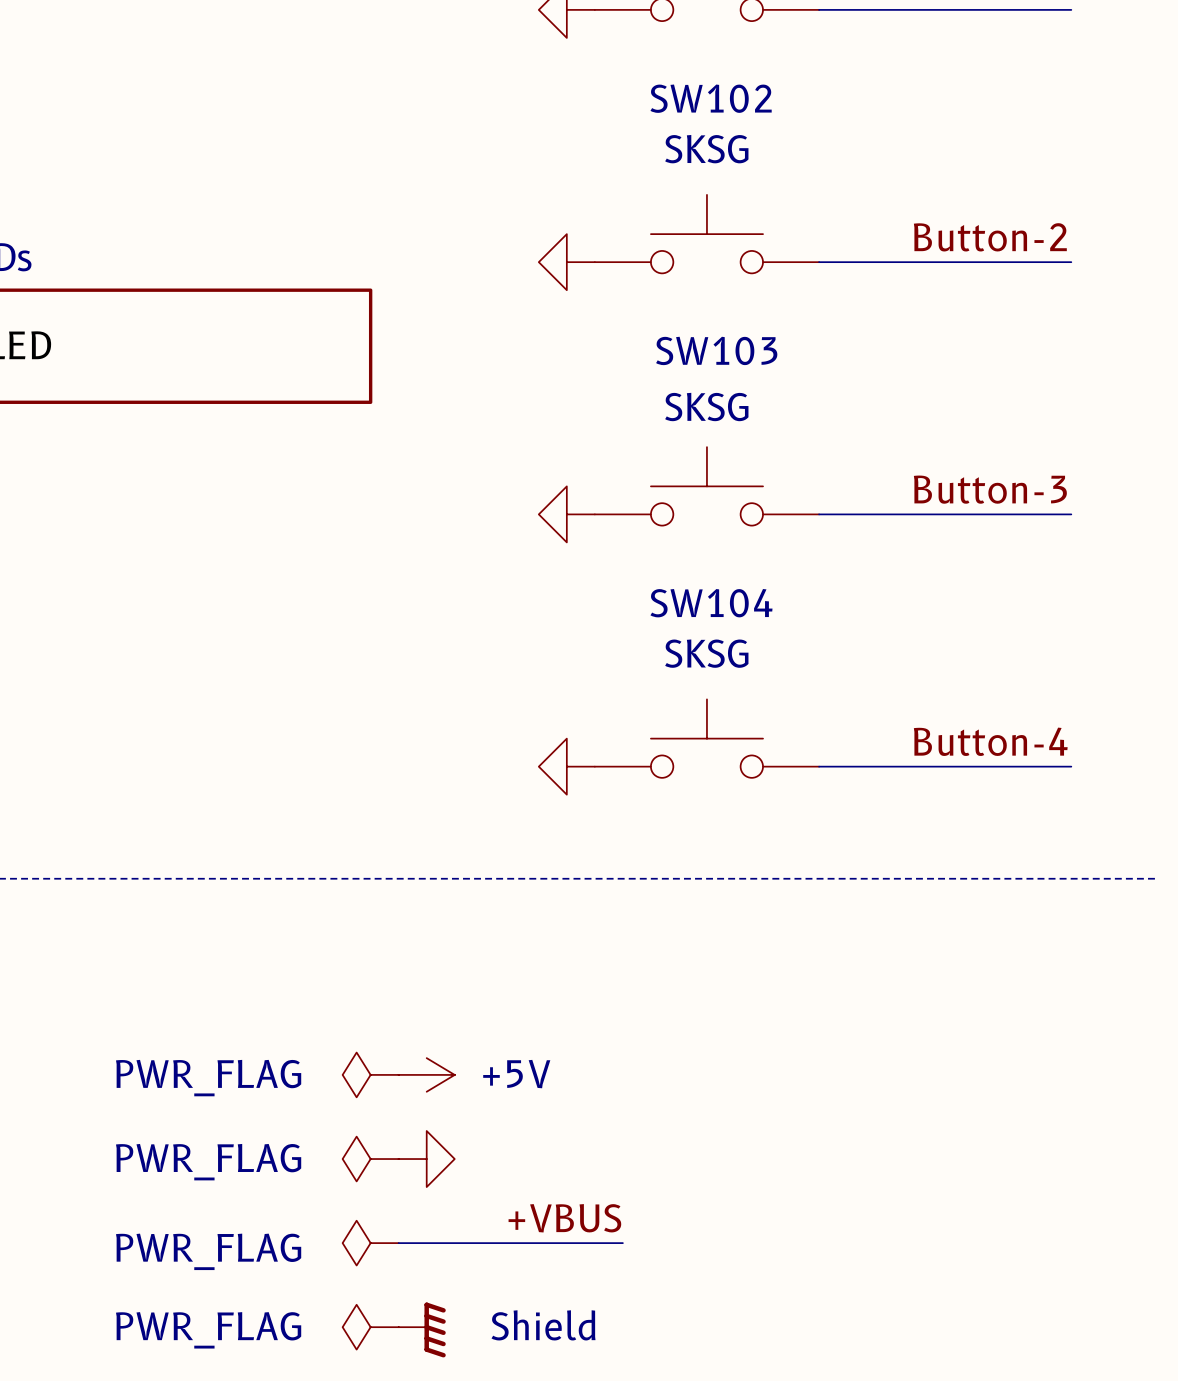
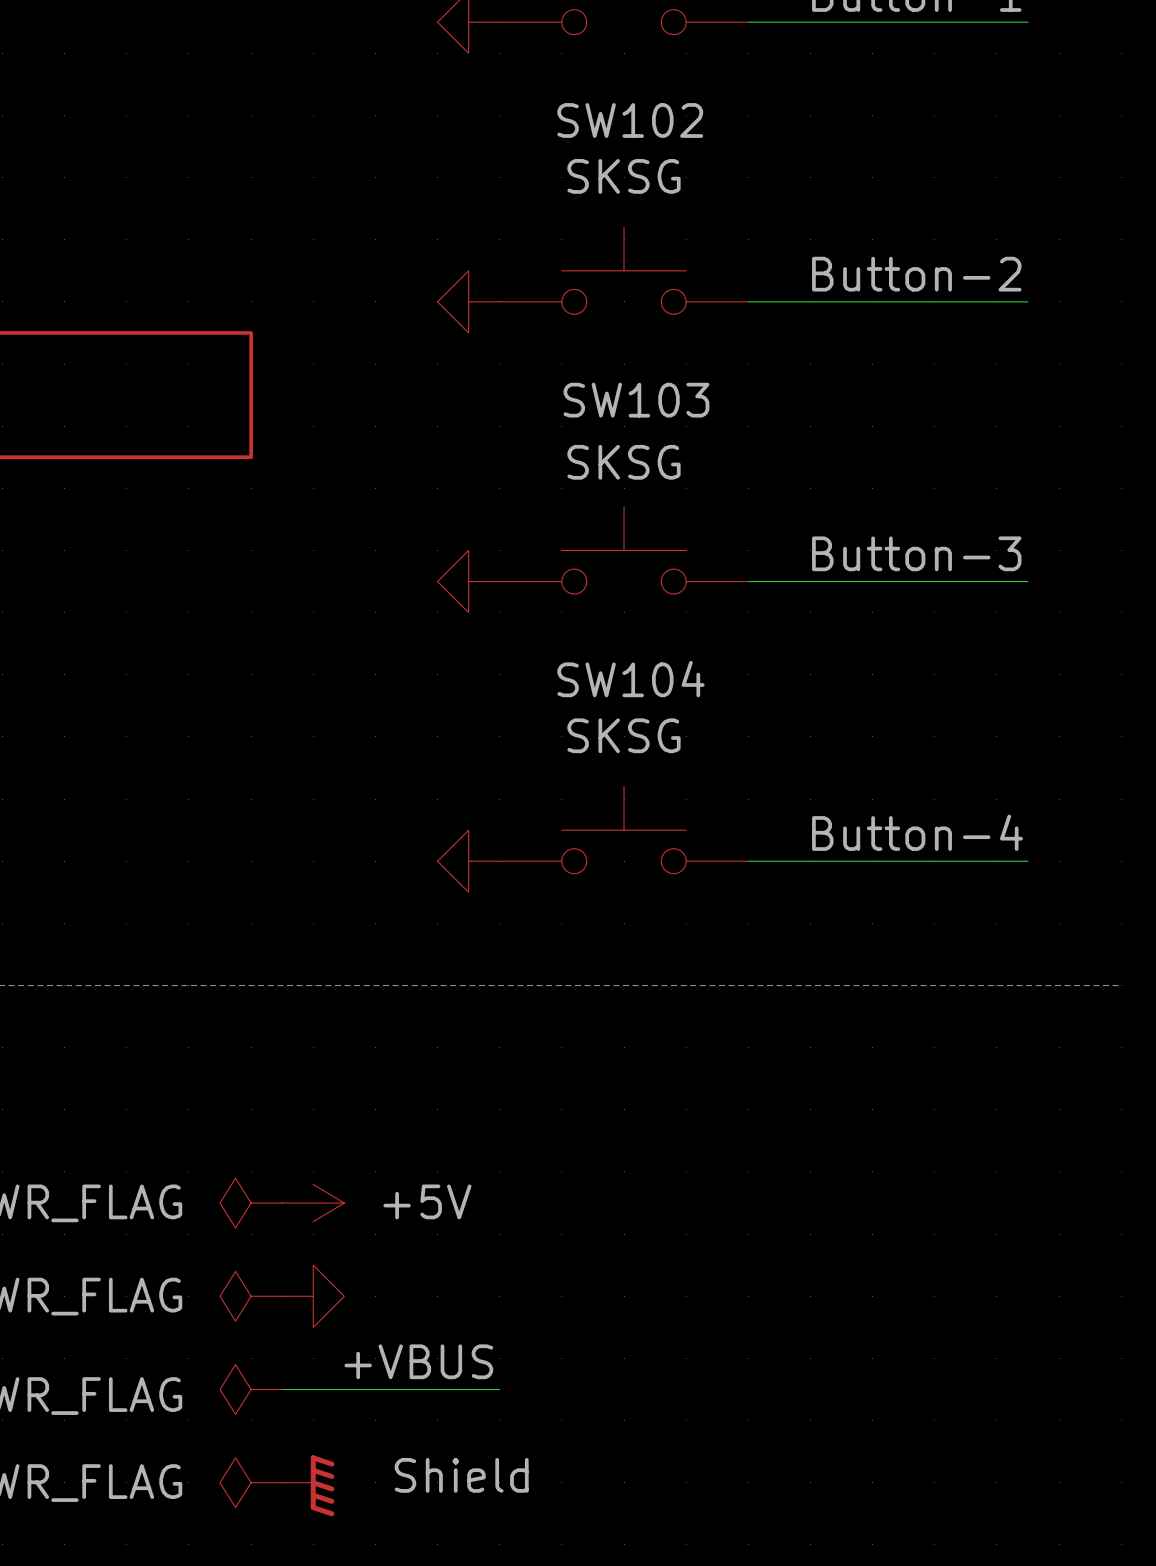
power symbol text position: +5V (516, 1074) -> +5V (427, 1201)
label position: +VBUS (564, 1218) -> +VBUS (418, 1361)
wire: (594, 1243) (622, 1243) -> none
power symbol text position: Shield (543, 1325) -> Shield (461, 1475)

